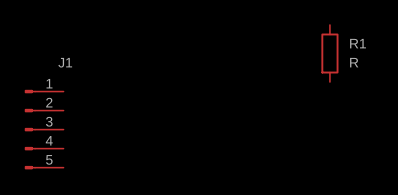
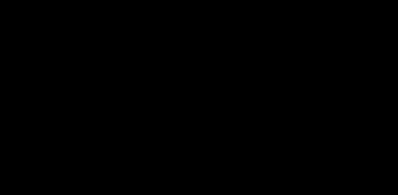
R1: R (329, 53) -> none
J1: (44, 129) -> none

